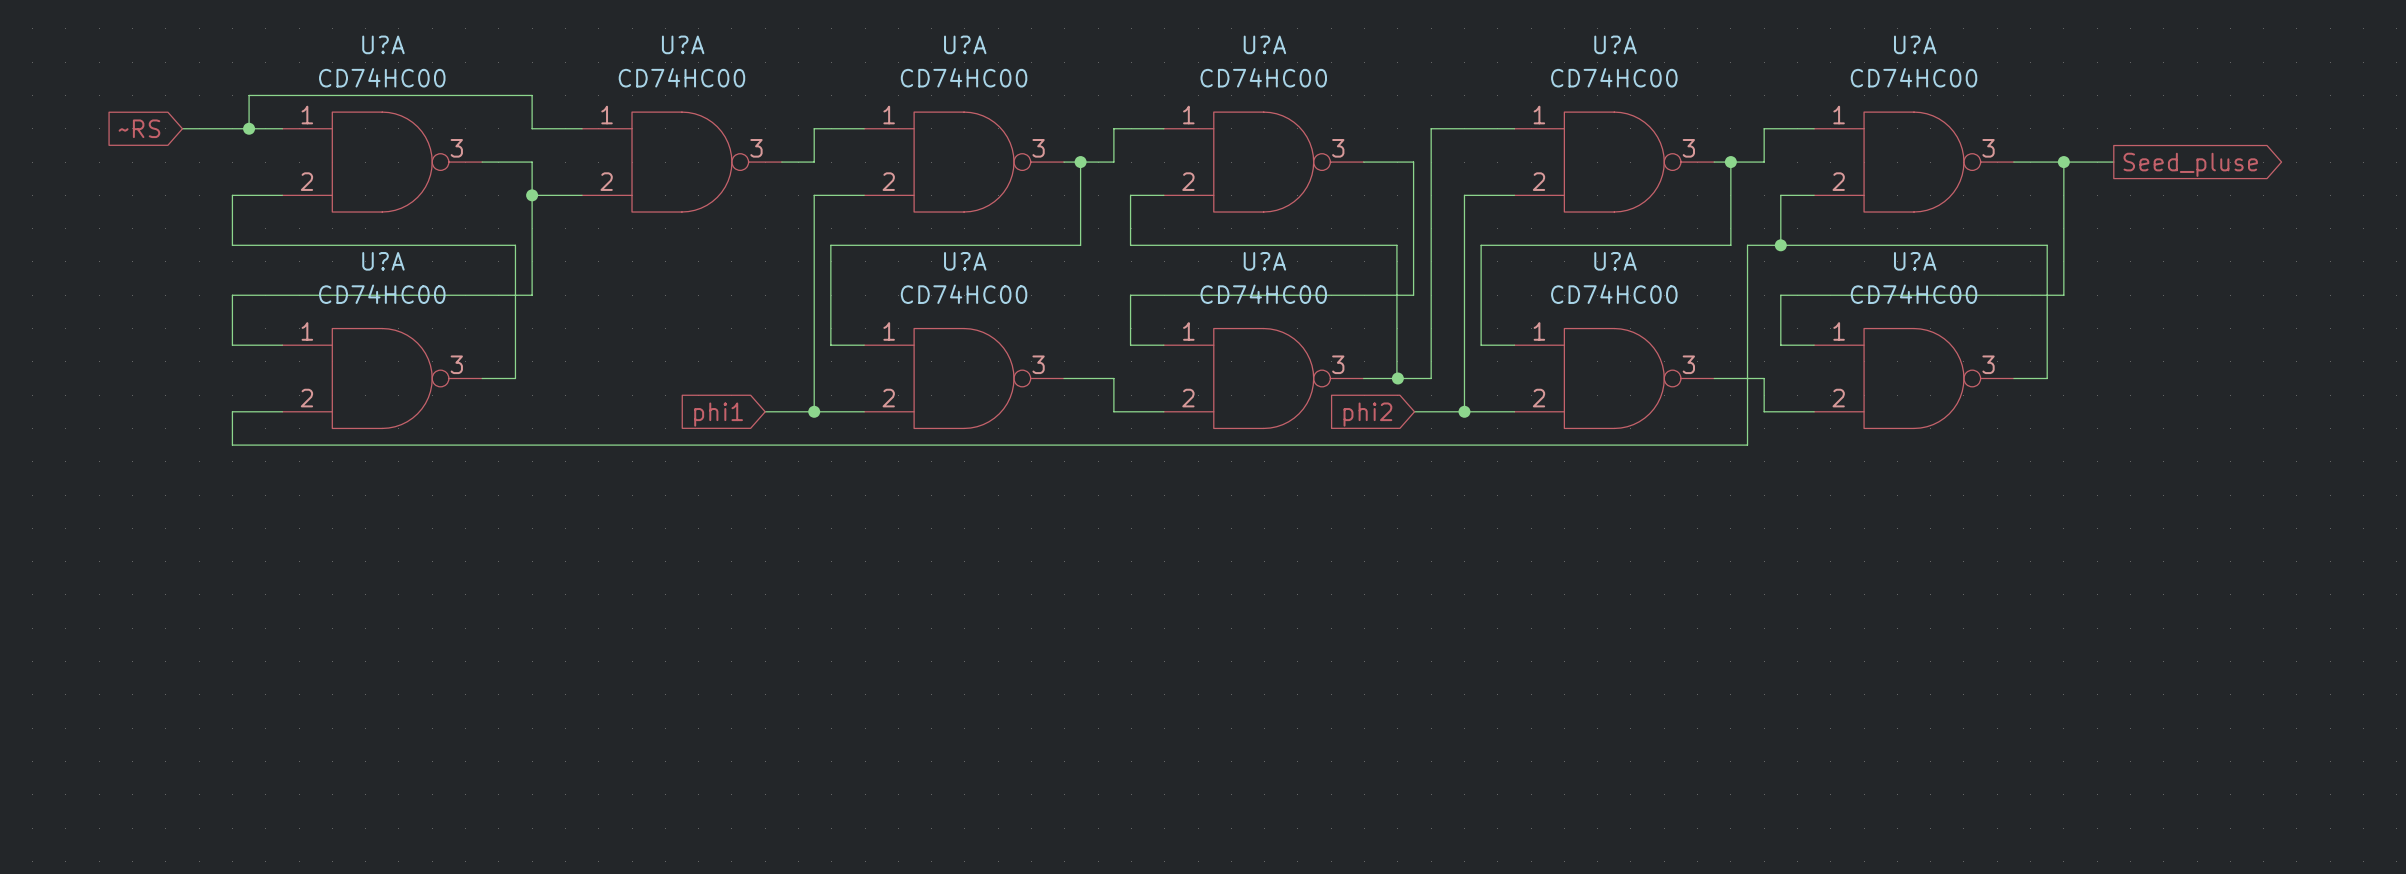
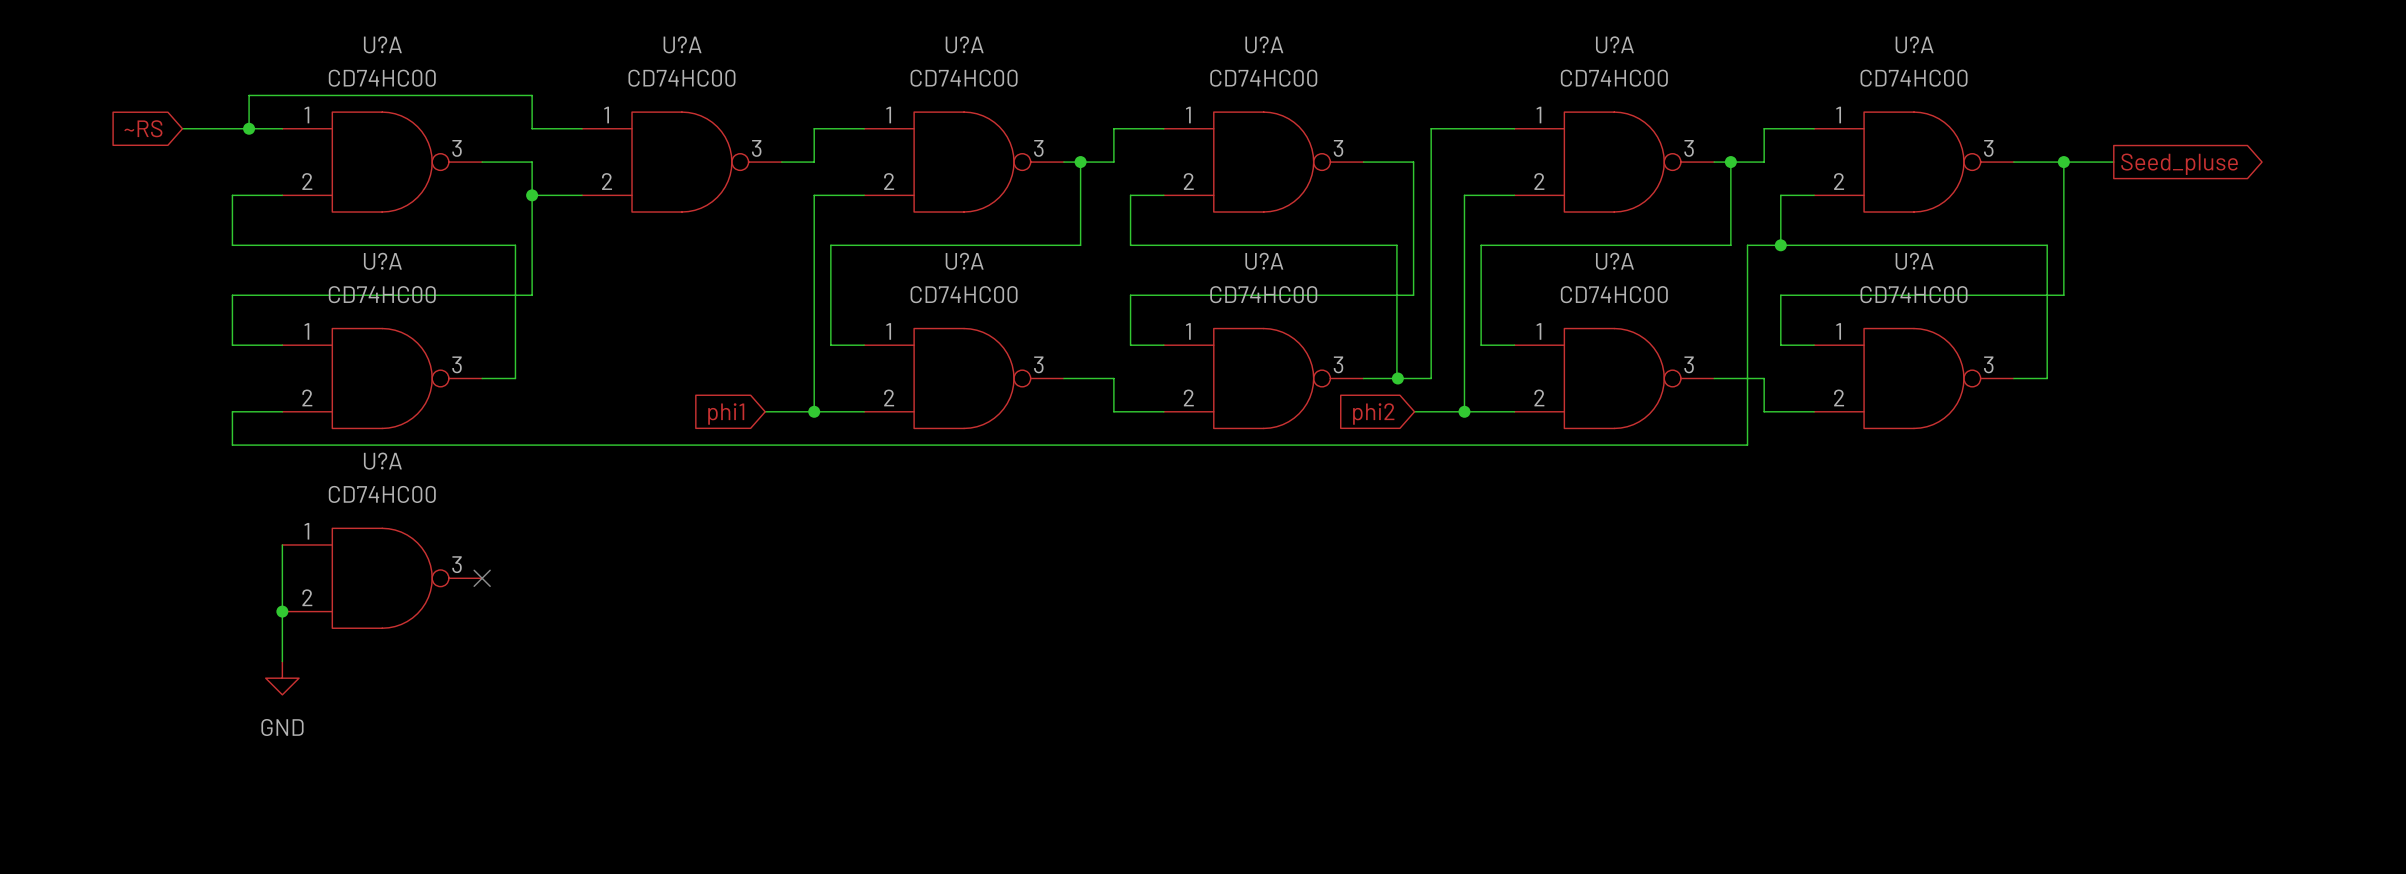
wire: none -> (282, 544) (282, 661)
U?A: none -> CD74HC00 (382, 578)
no-connect mark: none -> (482, 578)
junction: none -> (282, 611)
power symbol: none -> GND (282, 678)

